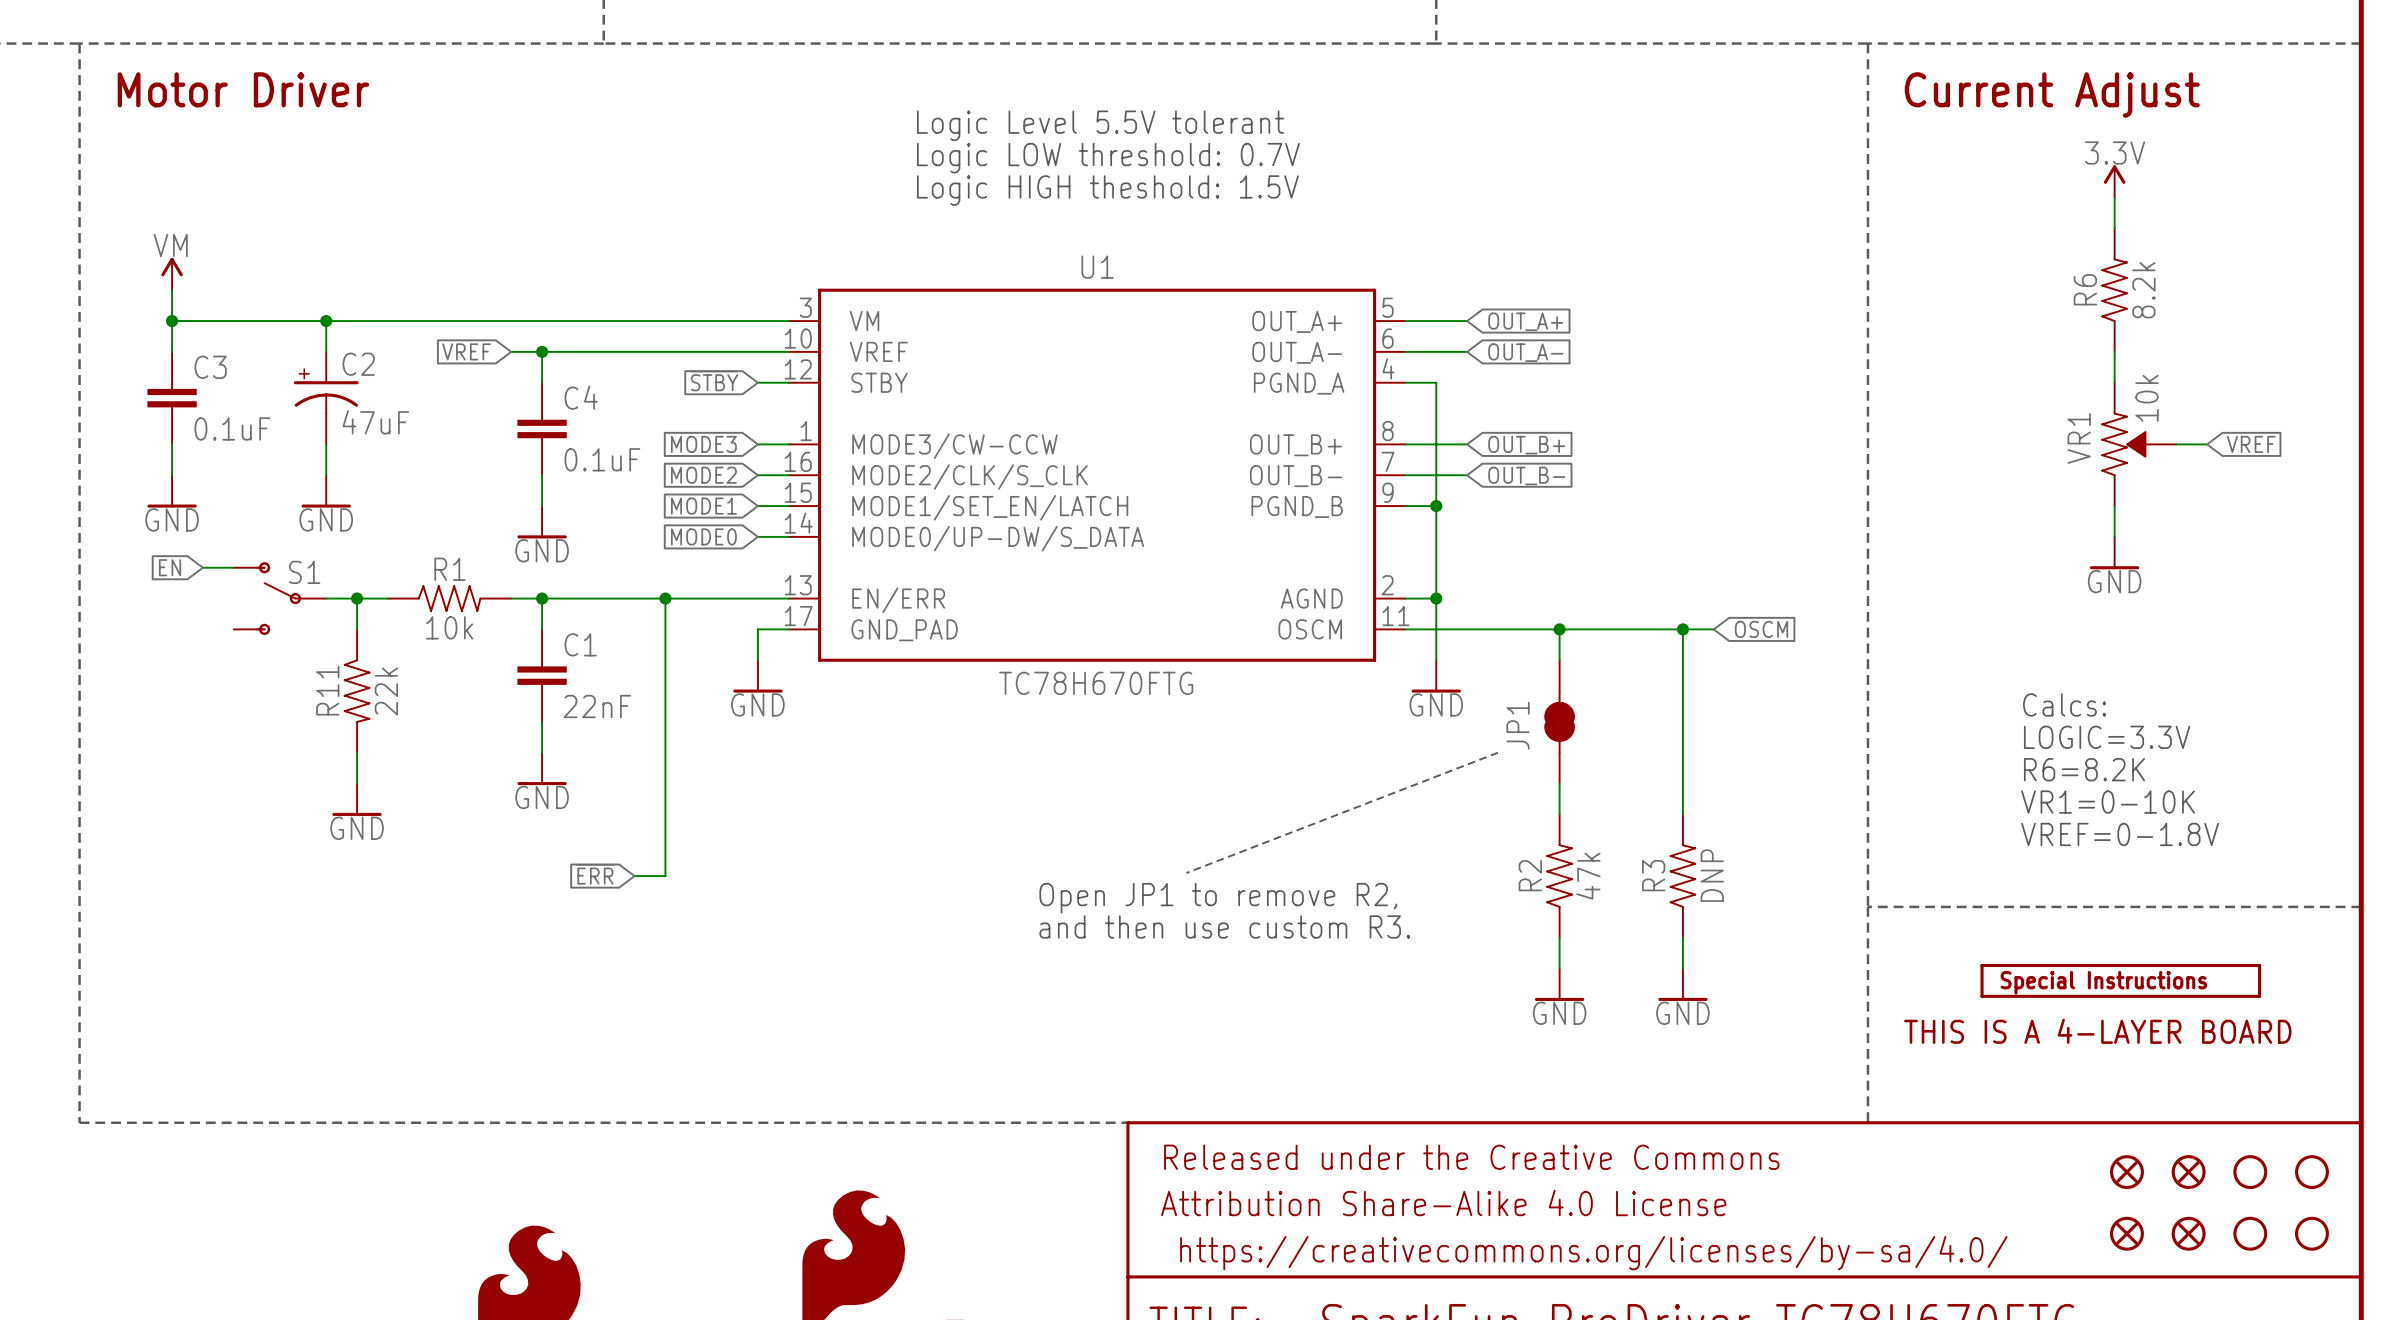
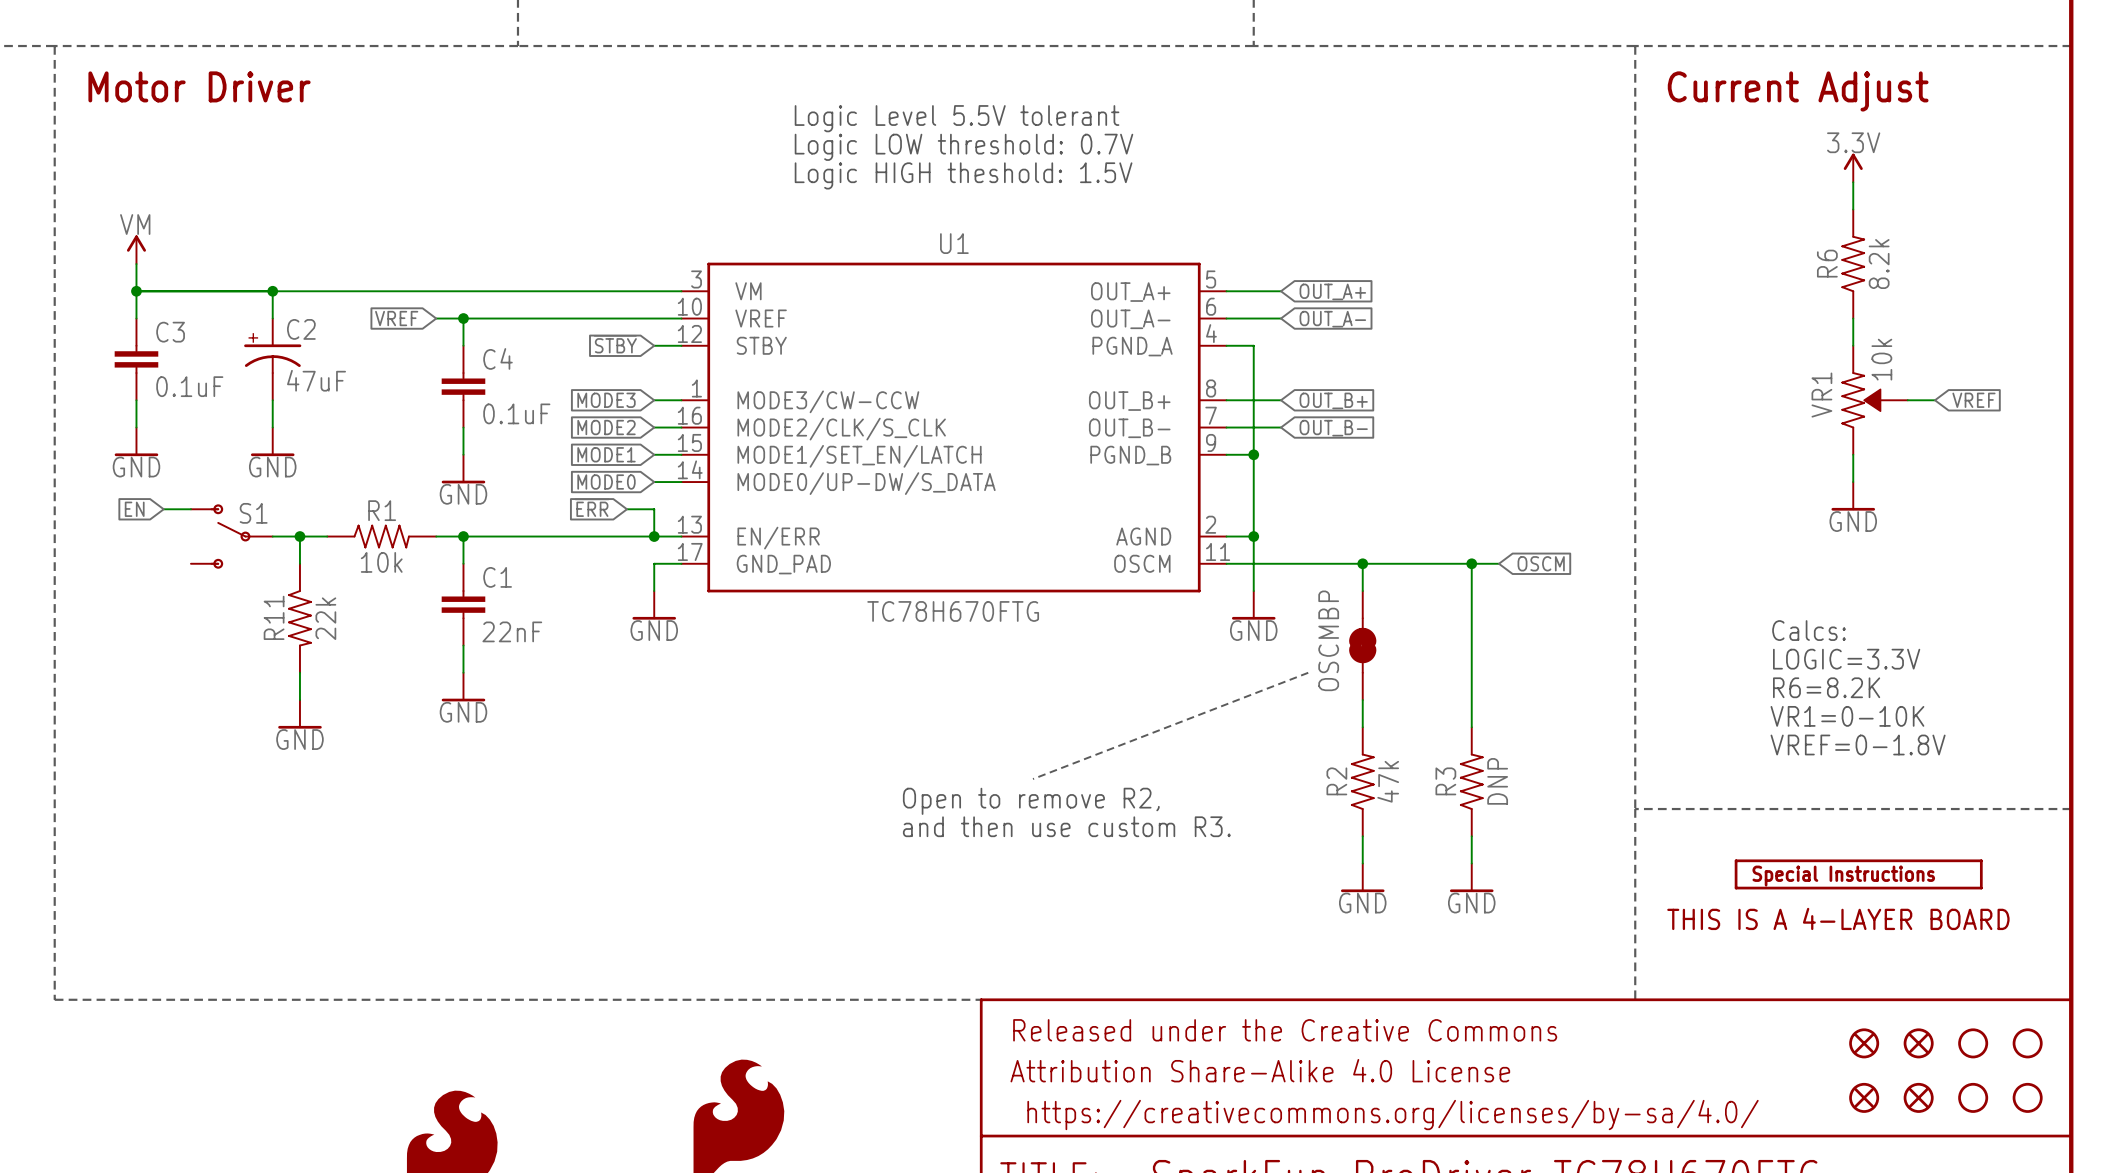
global label: none -> ~{ERR} (592, 507)
wire: none -> (626, 509) (654, 509) (654, 536)
wire: (665, 598) (665, 876) (634, 876) -> none
junction: (665, 598) -> none
junction: none -> (654, 536)
JP1 name: JP1 (1517, 725) -> OSCMBP (1328, 640)
global label: ~{ERR} (595, 874) -> none
text: Open JP1 to remove R2, (1218, 898) -> Open to remove R2, (1031, 801)

